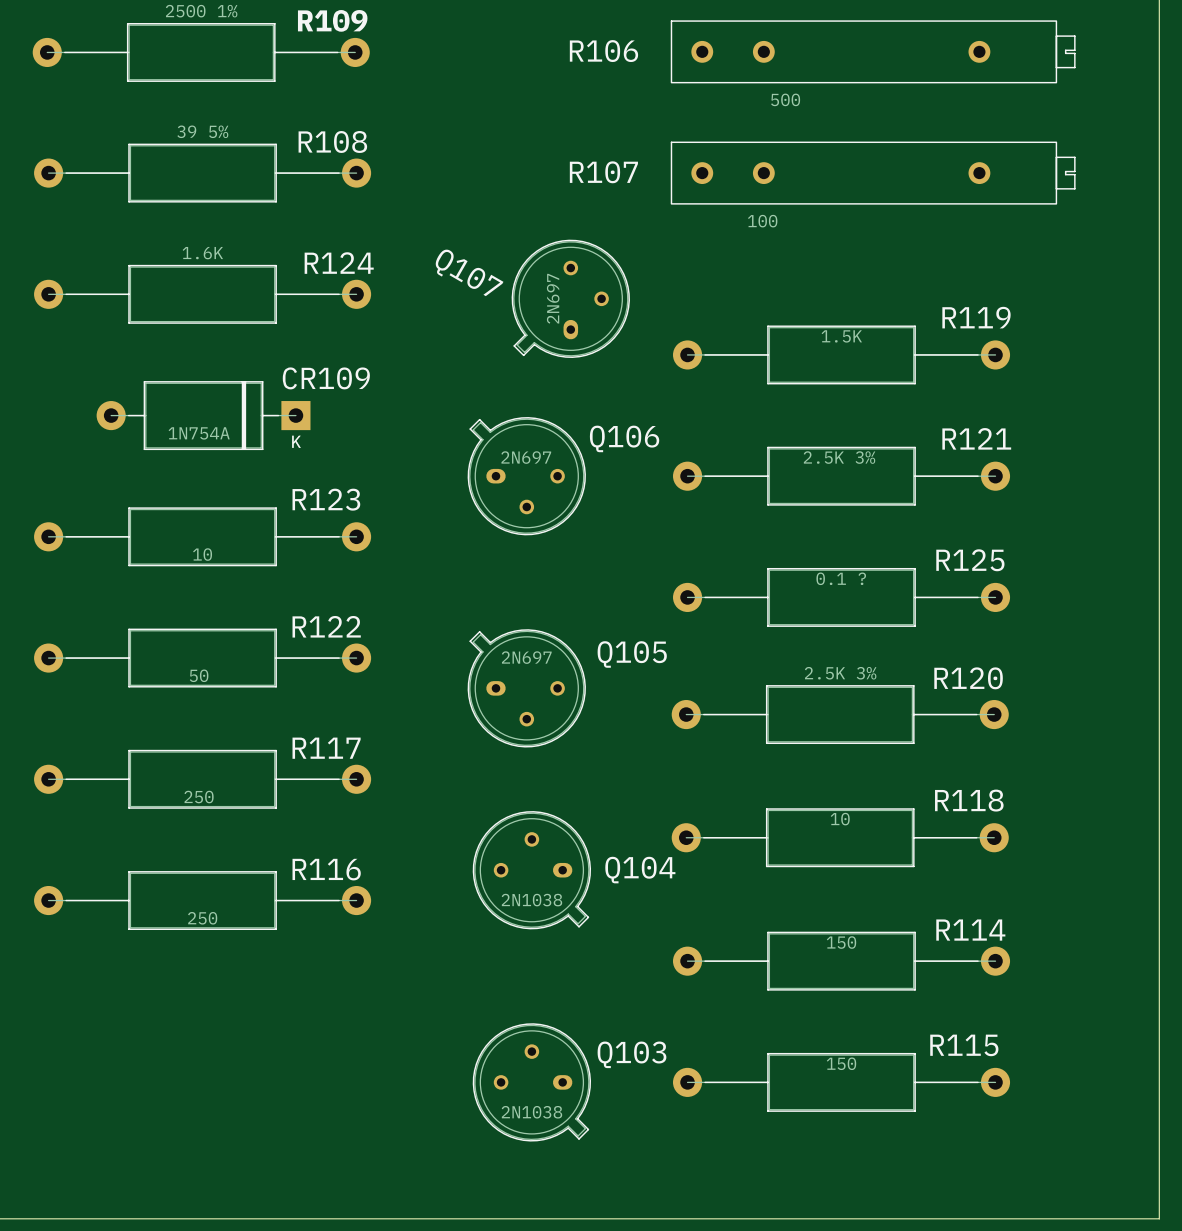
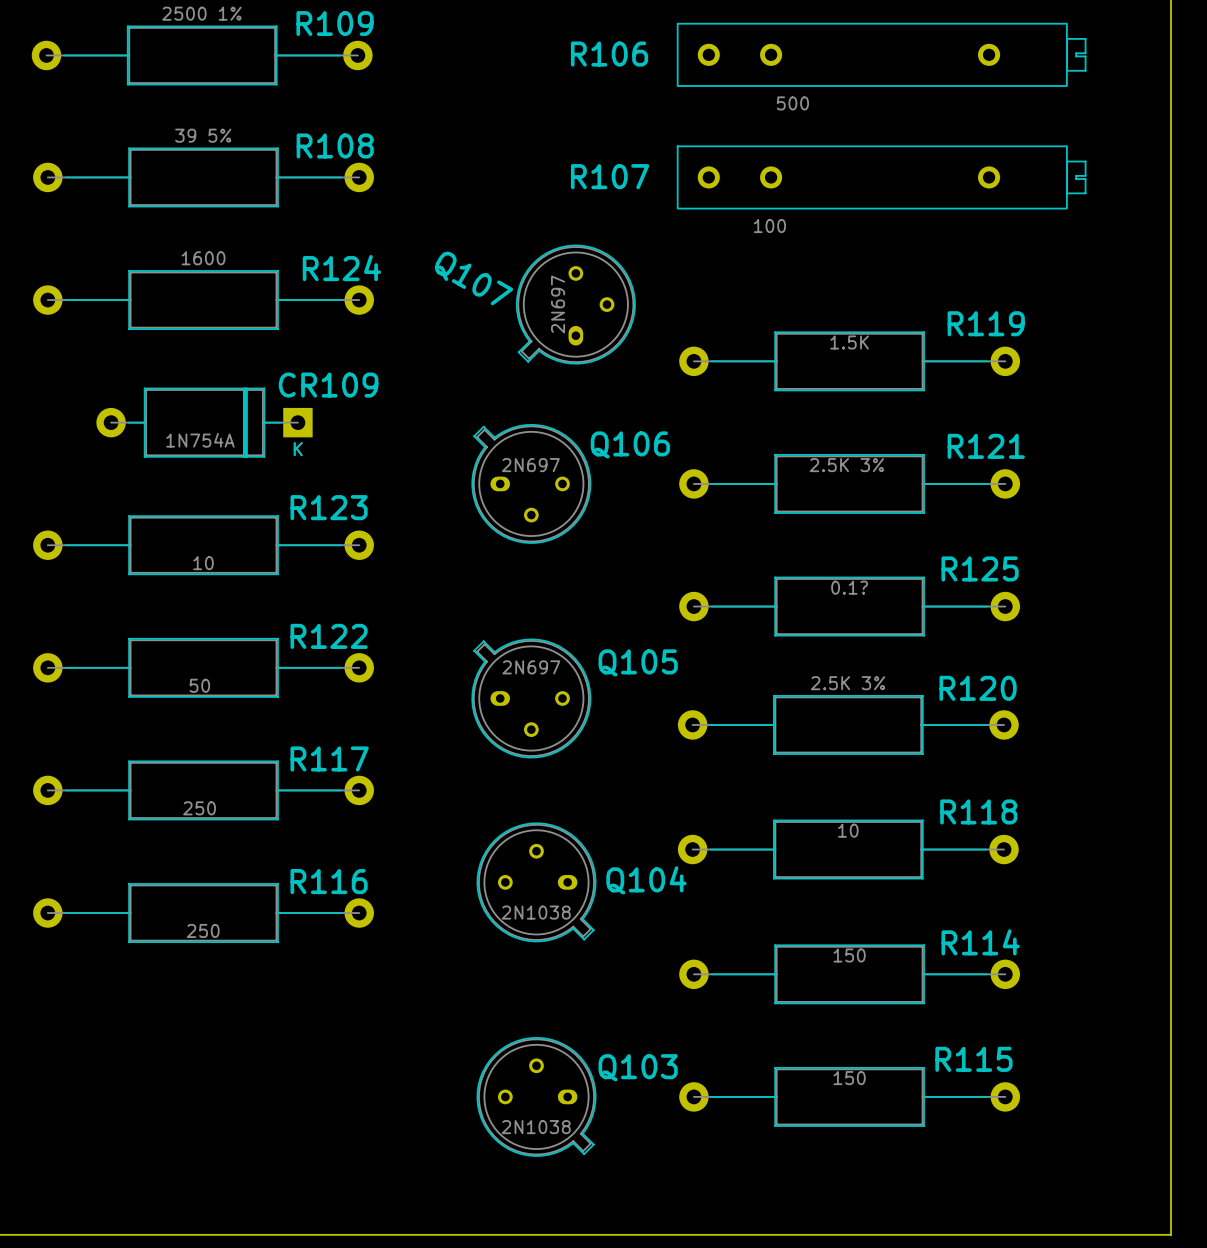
R124 value: 1.6K (202, 253) -> 1600 (203, 258)
R125 value: 0.1 ? (841, 578) -> 0.1? (849, 587)

